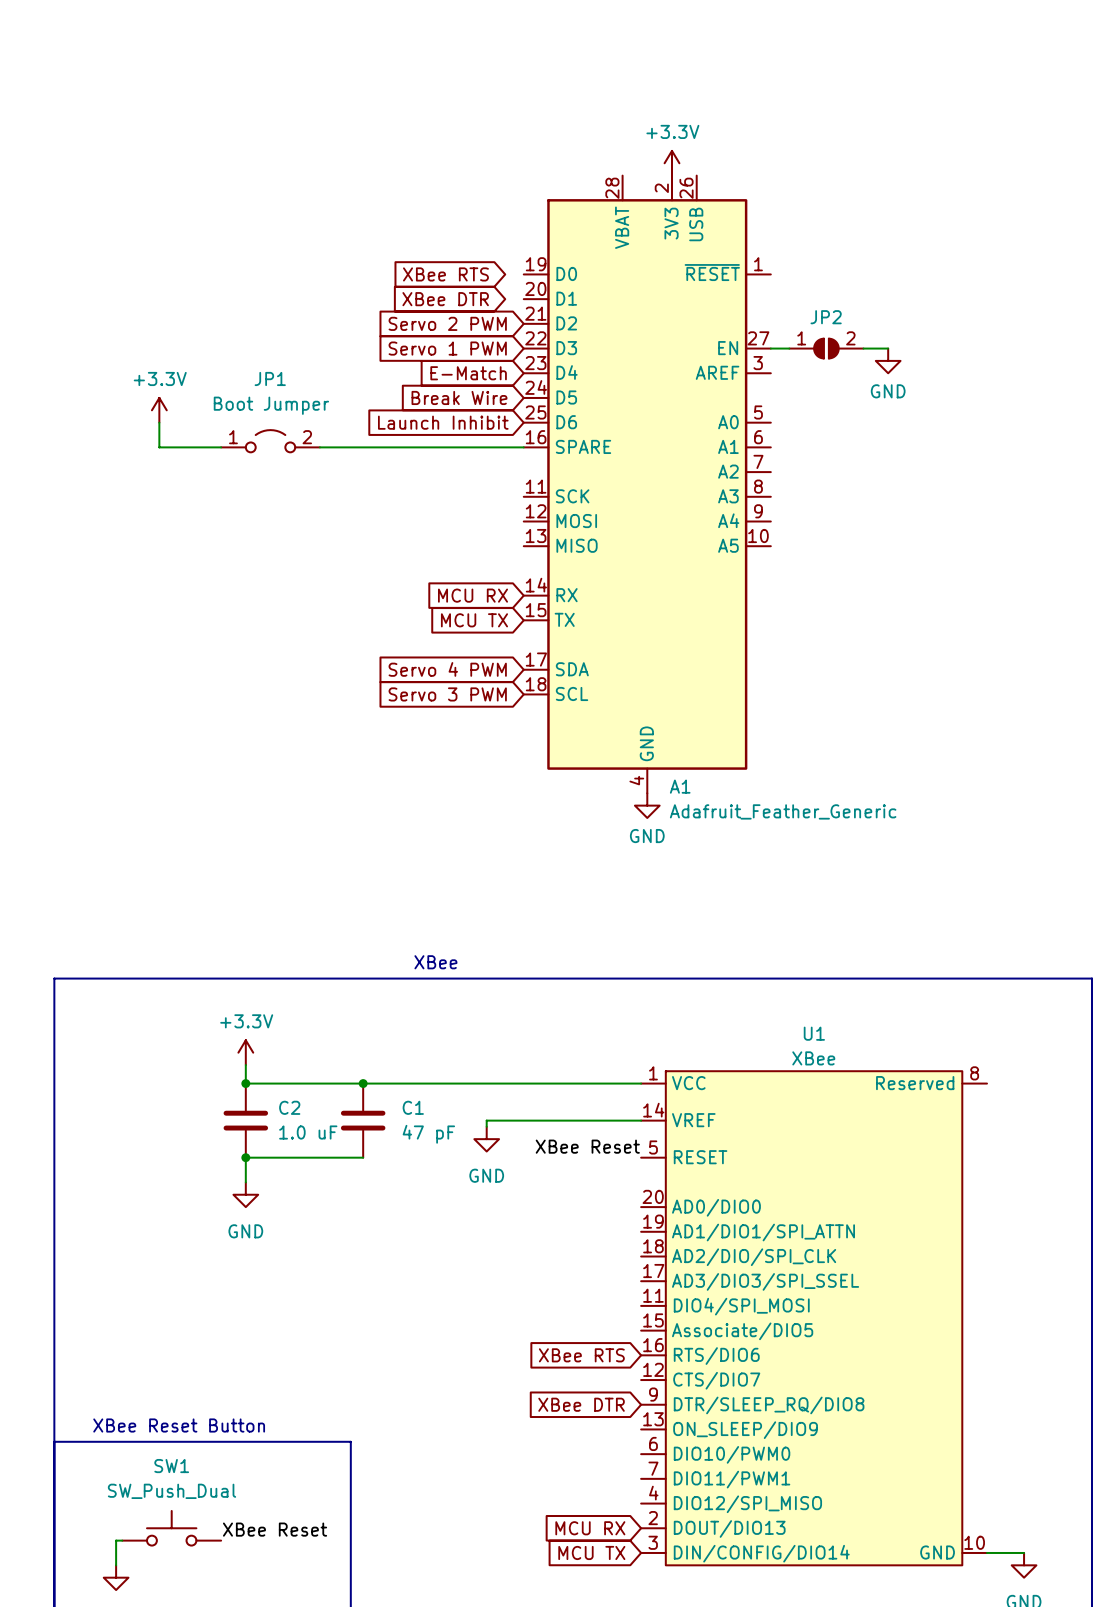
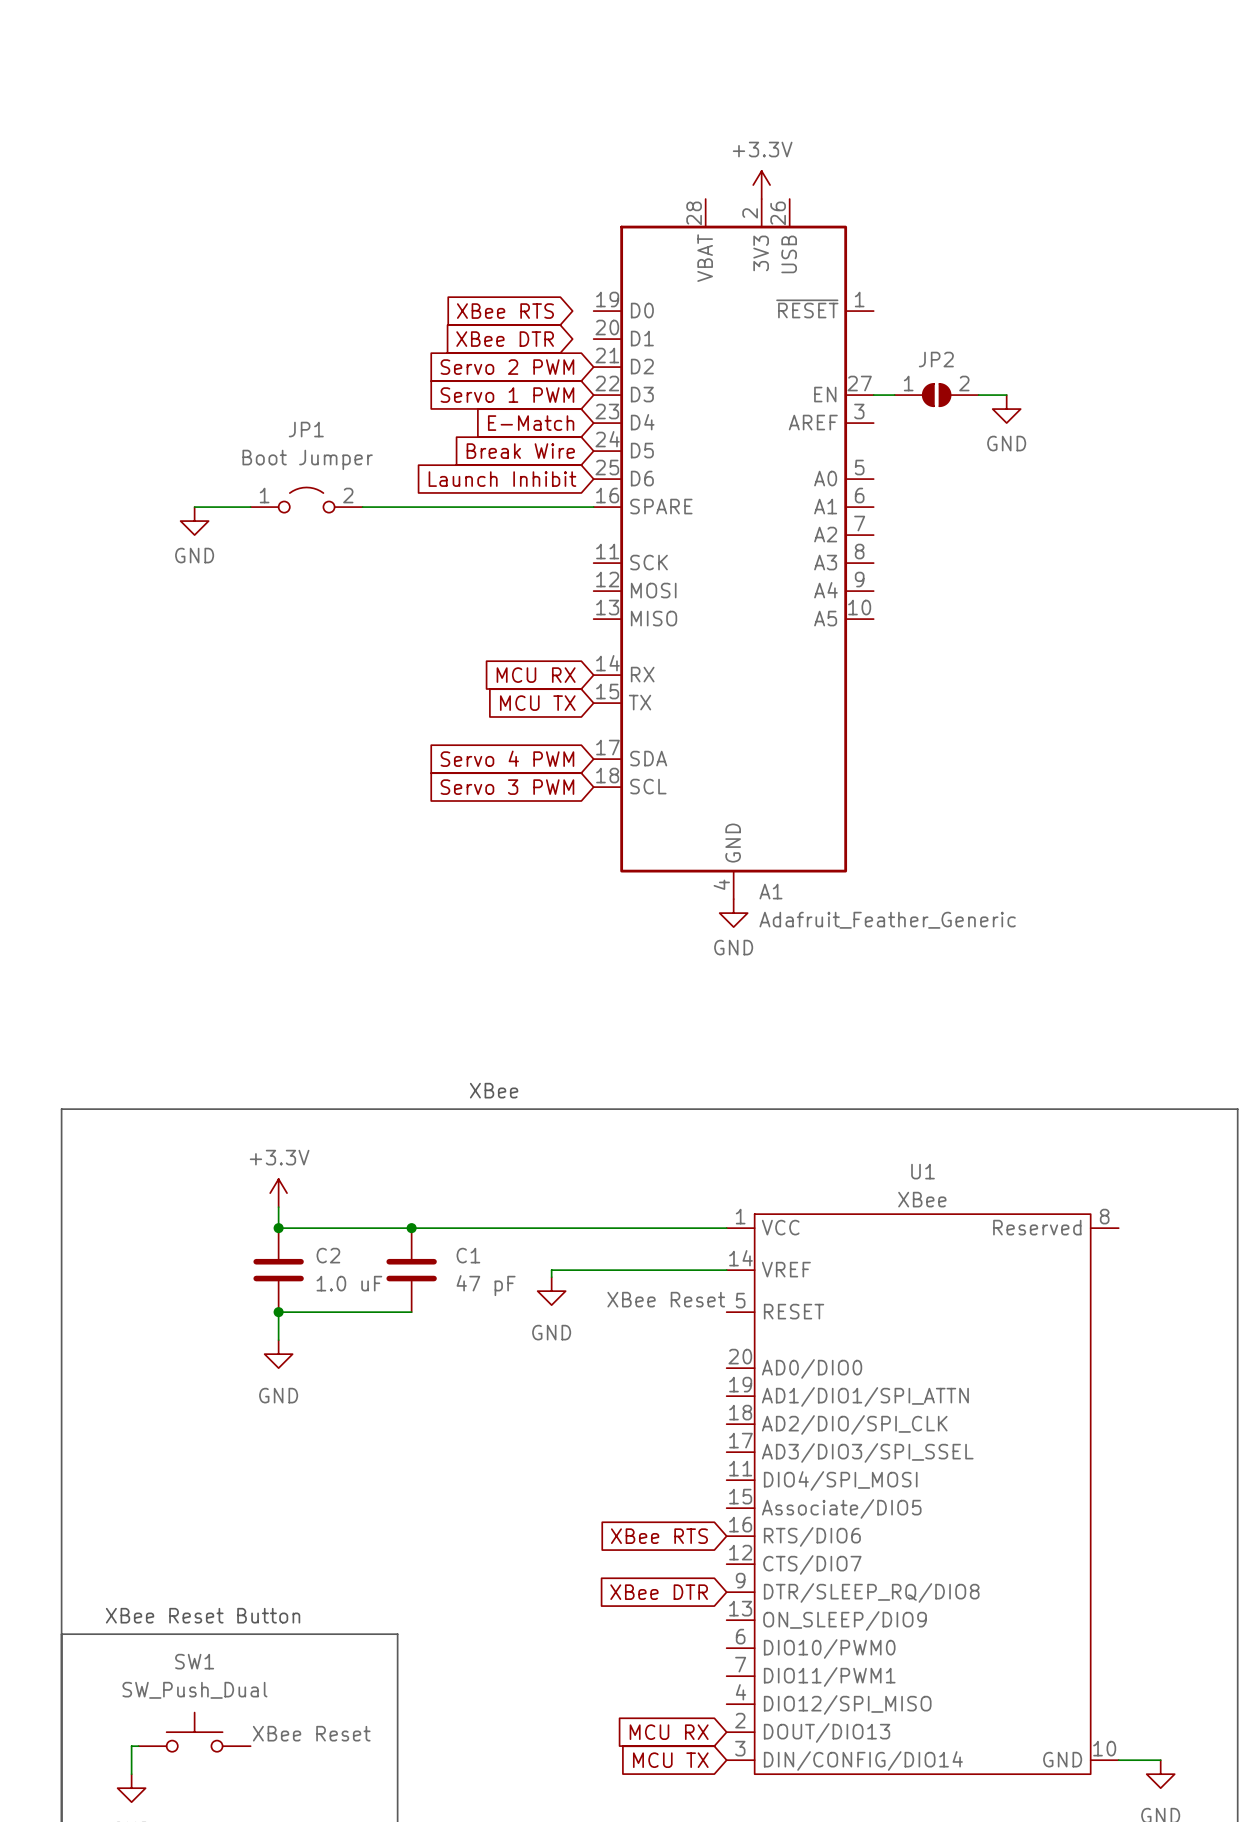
power symbol: +3.3V (159, 410) -> none
wire: (159, 422) (159, 447) (171, 447) -> none
power symbol: none -> GND (194, 521)

